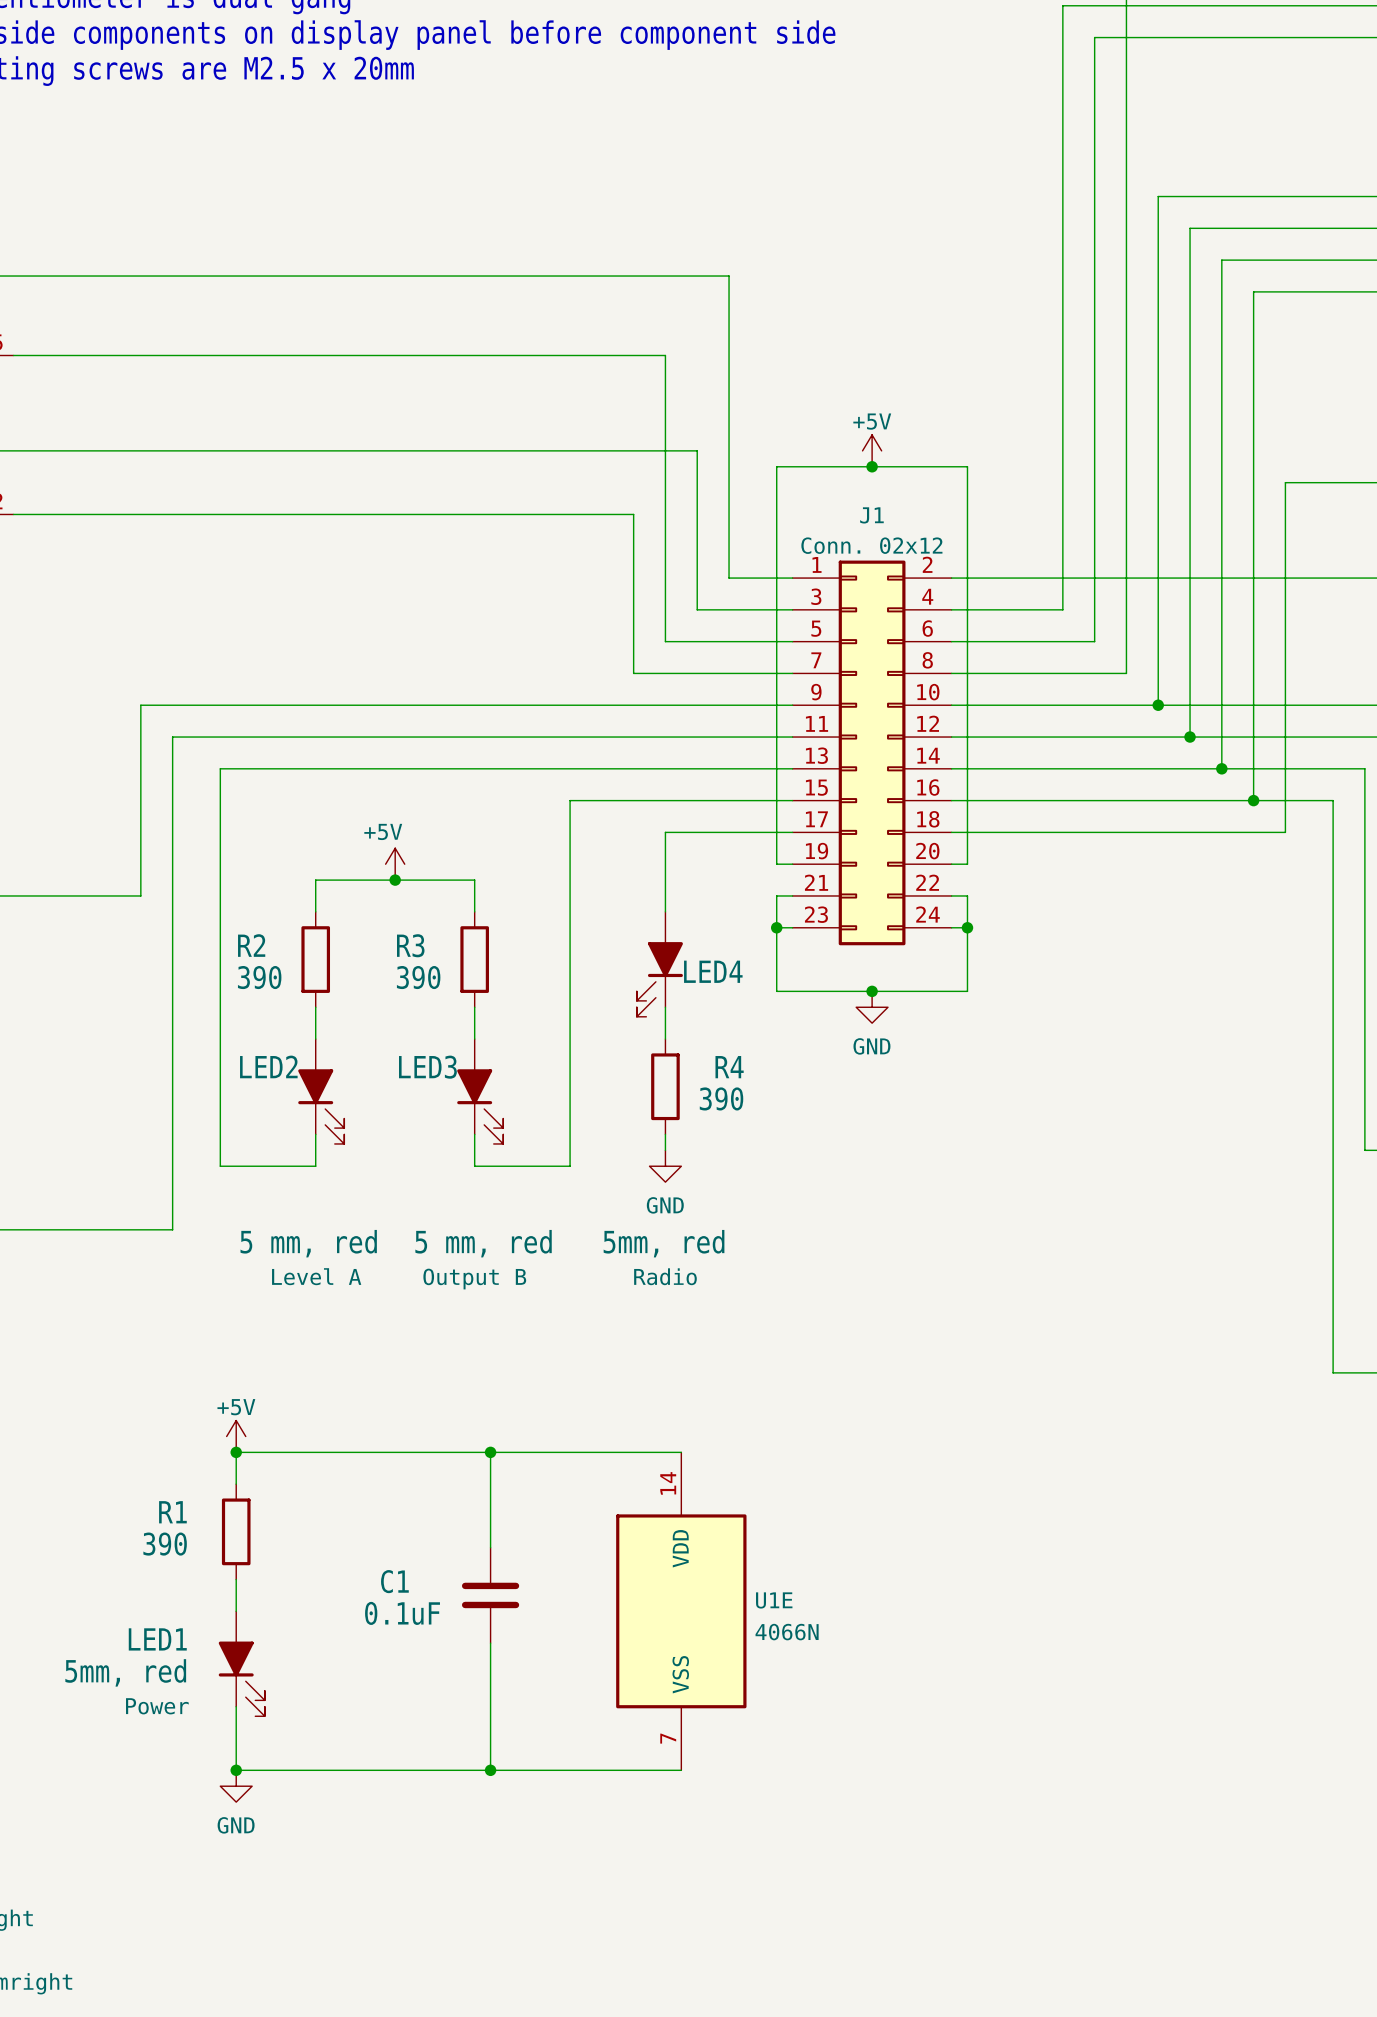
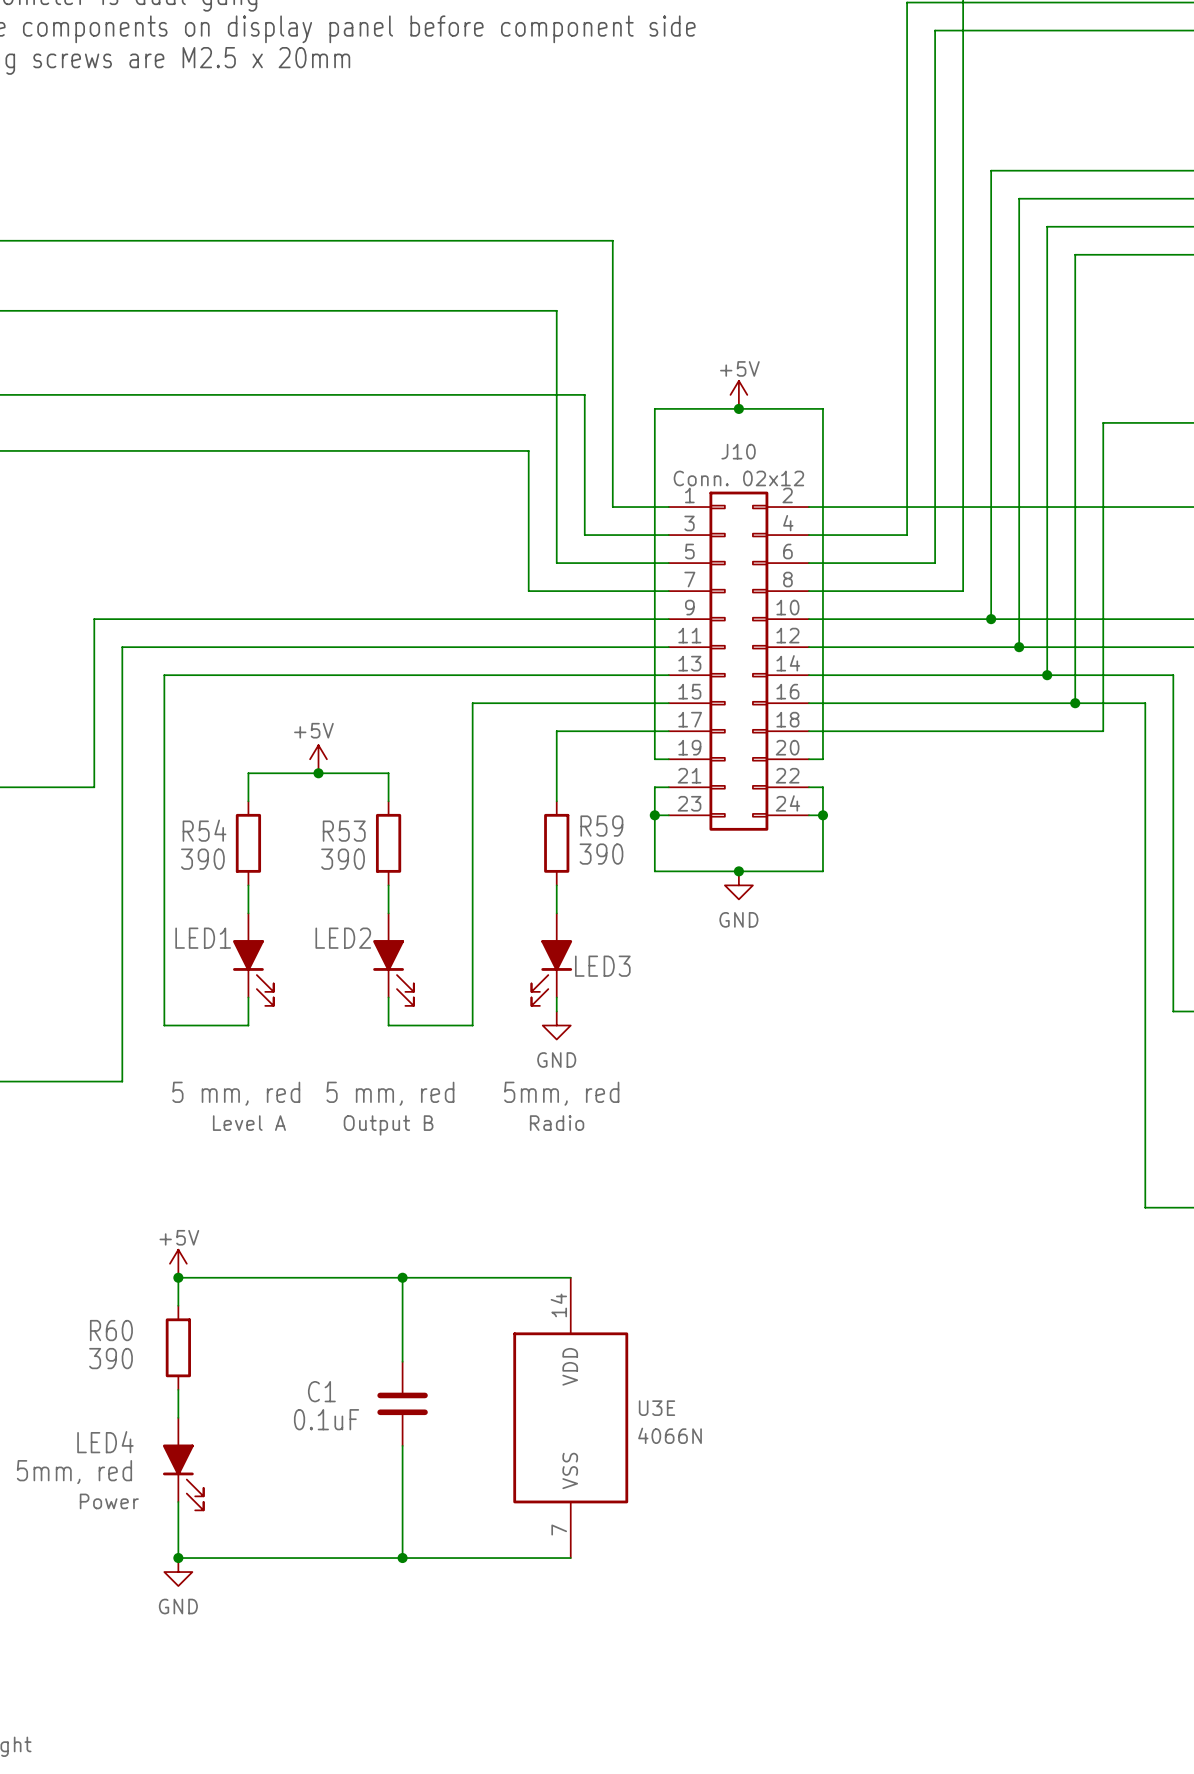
J1 name: J1 (871, 515) -> J10 (738, 451)
R2 name: R2 (251, 945) -> R54 (204, 830)
R3 name: R3 (410, 945) -> R53 (344, 831)
R59: none -> 390 (556, 843)
LED4: 5mm, red (659, 964) -> none
LED2 name: LED2 (268, 1066) -> LED1 (203, 938)
LED3 name: LED3 (427, 1067) -> LED2 (343, 938)
R4: 390 (665, 1086) -> none
LED3: none -> 5mm, red (551, 959)
R1 name: R1 (172, 1512) -> R60 (111, 1330)
U1E name: U1E (774, 1600) -> U3E (656, 1408)
LED1 name: LED1 (157, 1639) -> LED4 (105, 1442)

